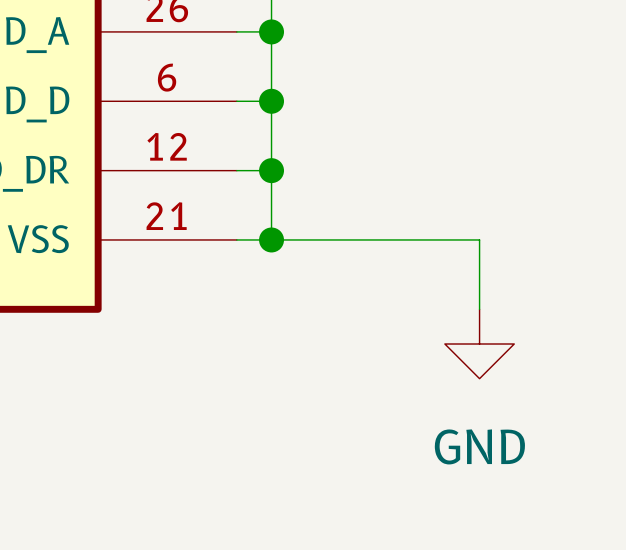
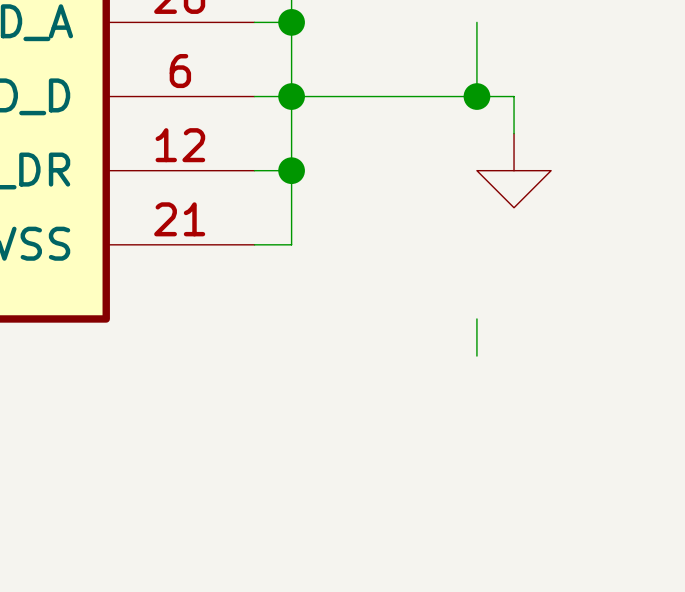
wire: none -> (476, 22) (476, 96)
wire: none -> (291, 96) (514, 96) (514, 133)
junction: none -> (476, 96)
power symbol: none -> (514, 170)
wire: (271, 239) (479, 239) (479, 309) -> none
junction: (271, 239) -> none
wire: none -> (476, 318) (476, 356)
power symbol: GND (479, 344) -> none

